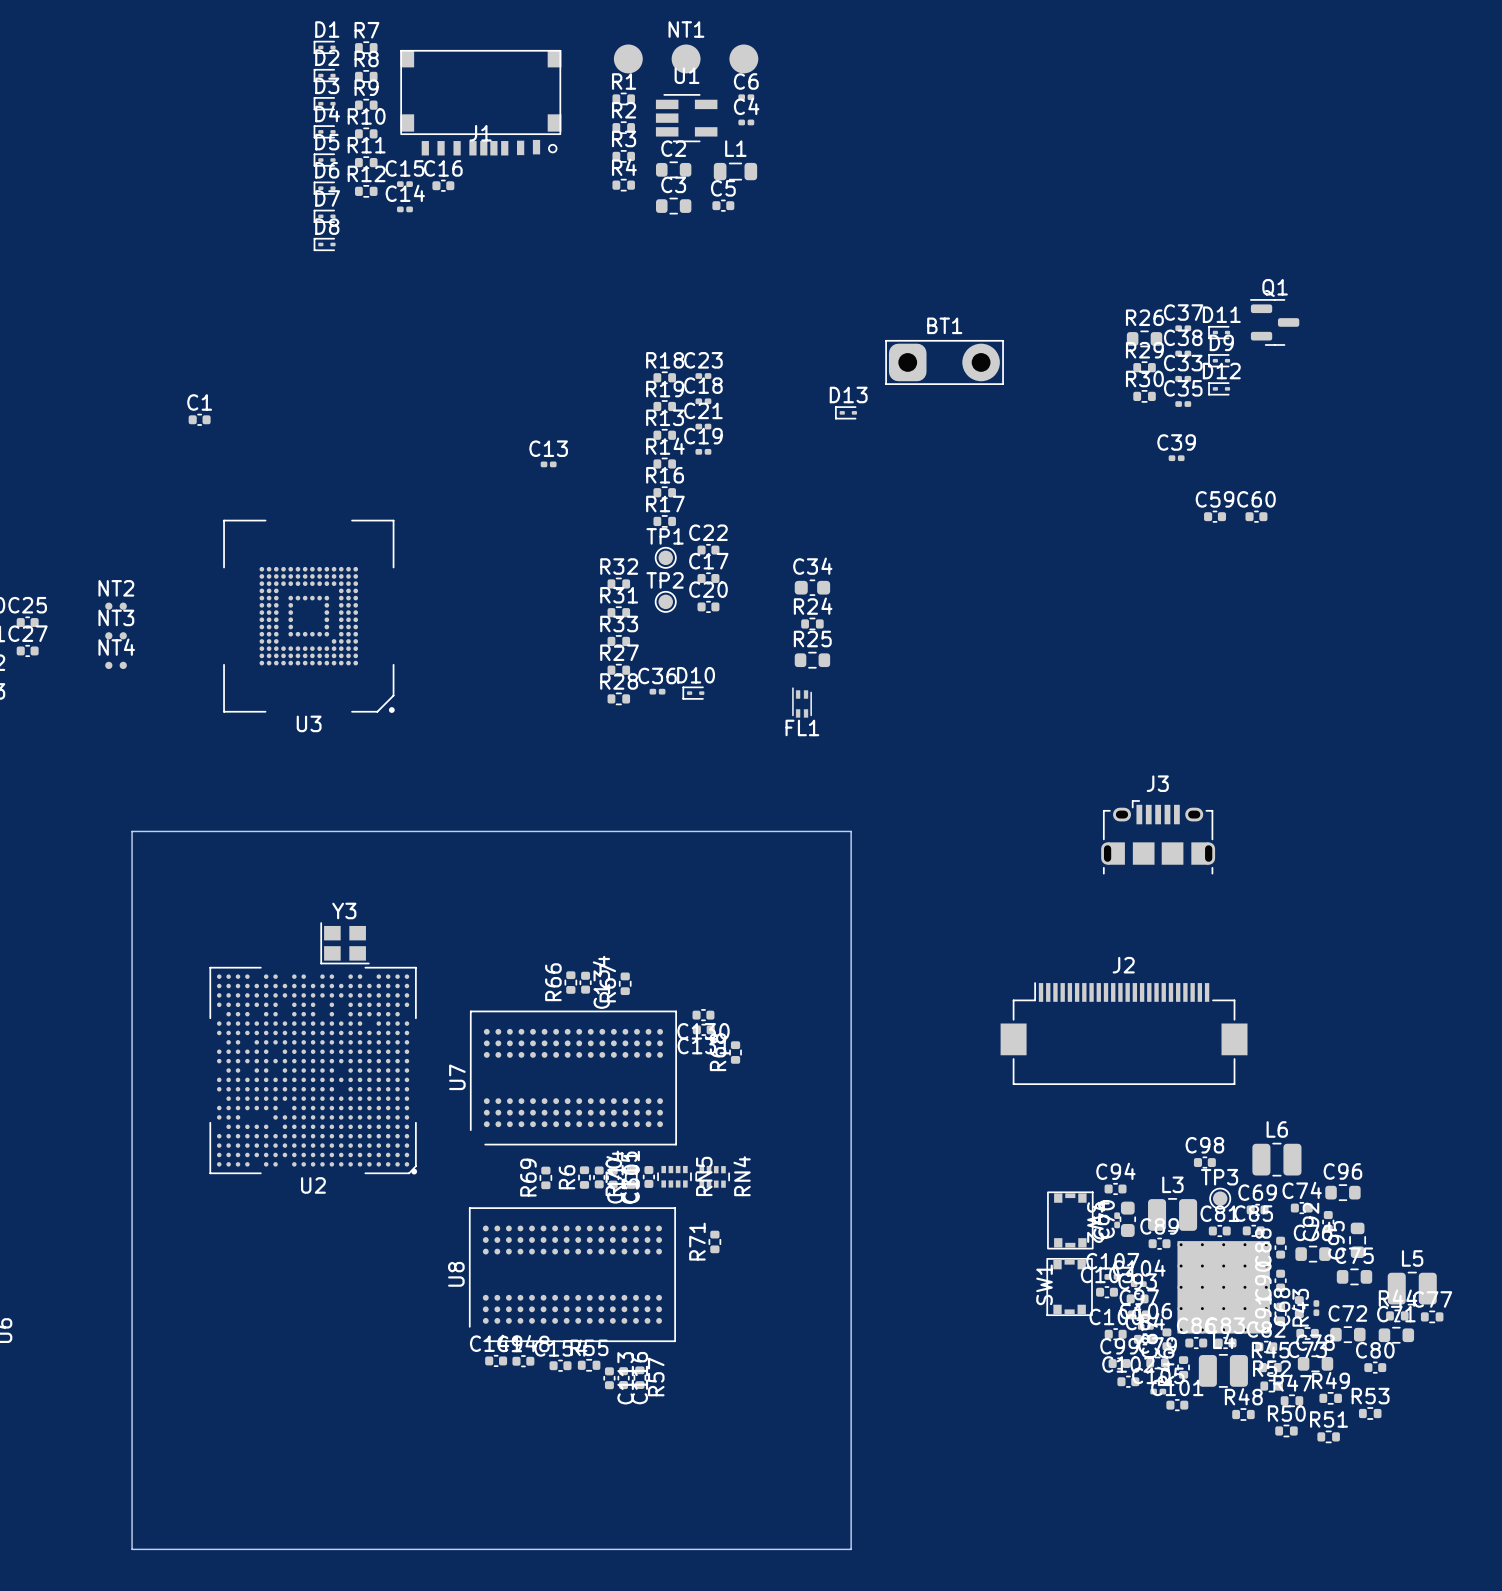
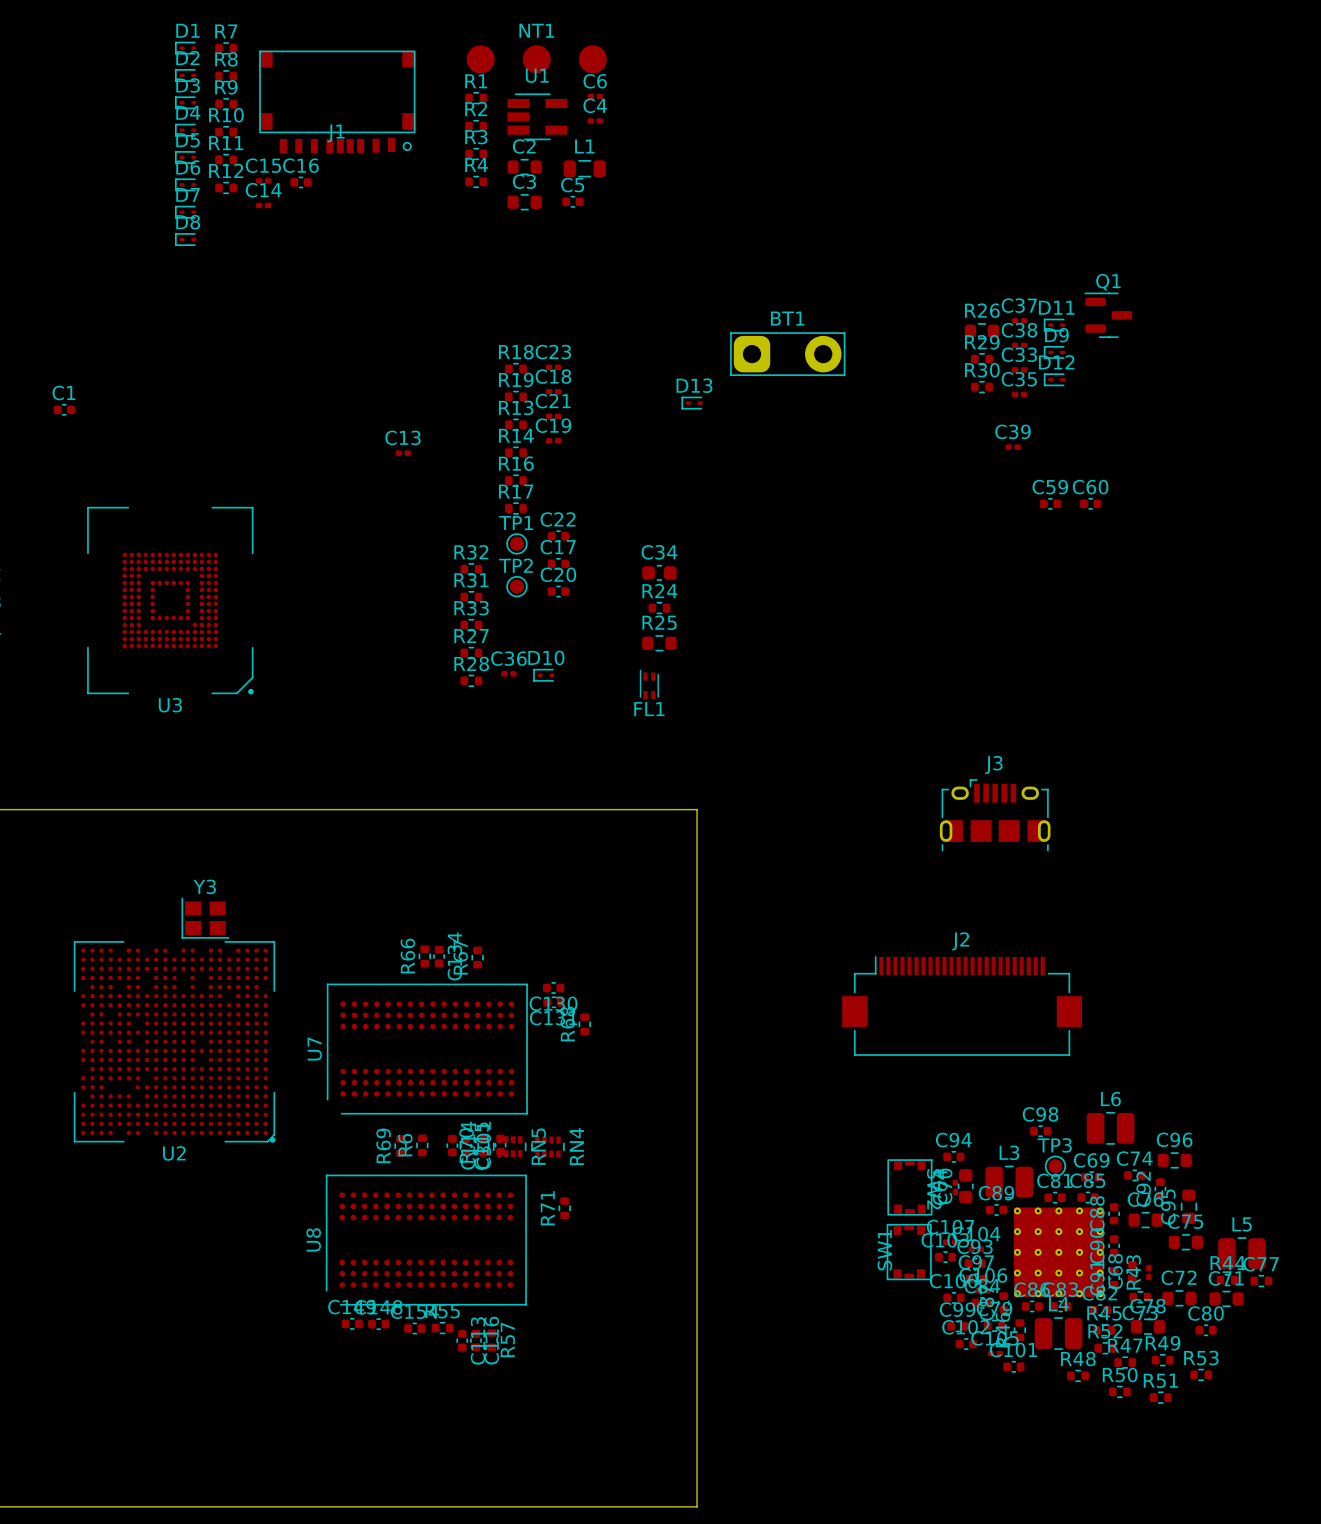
RN5 position: (674, 1176) -> (509, 1146)
RN4 position: (712, 1176) -> (547, 1147)
R6 position: (584, 1177) -> (422, 1145)

